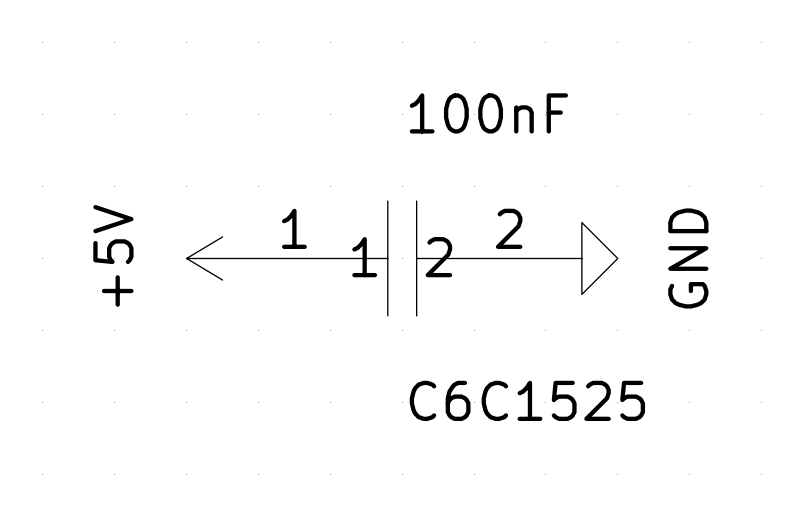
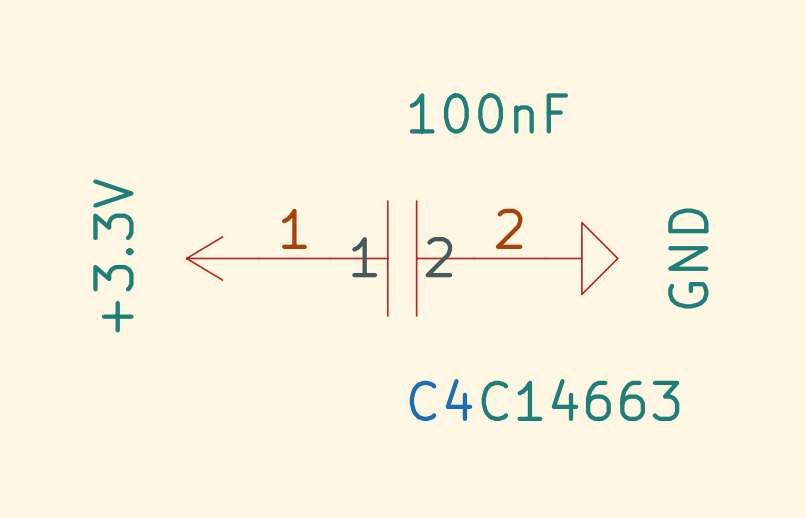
power symbol: +5V (222, 258) -> +3.3V (222, 258)
C6 name: C6 (440, 400) -> C4 (440, 400)
C6 text: C1525 (563, 400) -> C14663 (580, 400)

